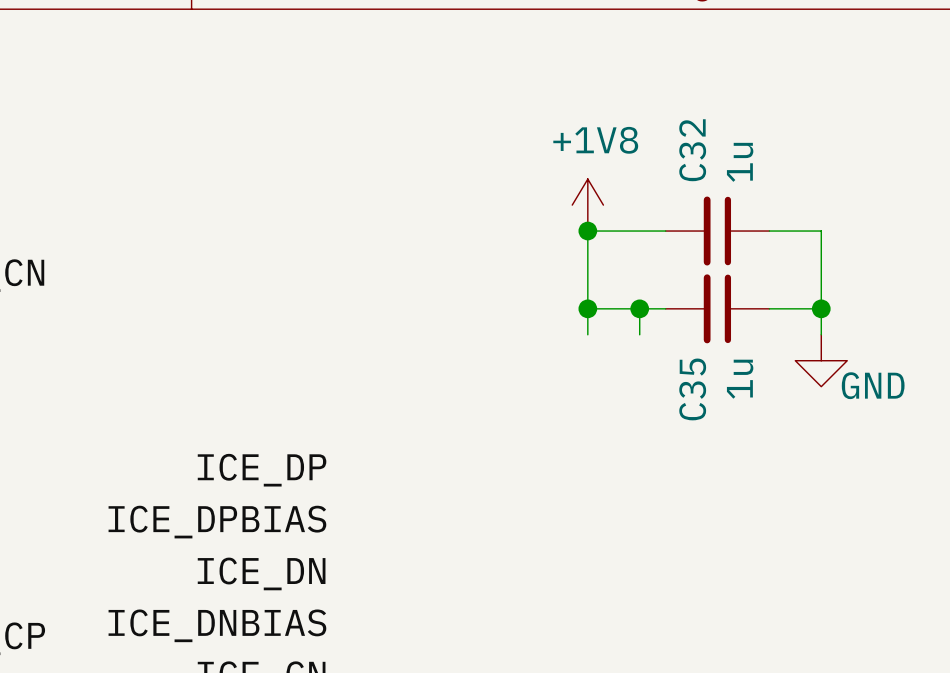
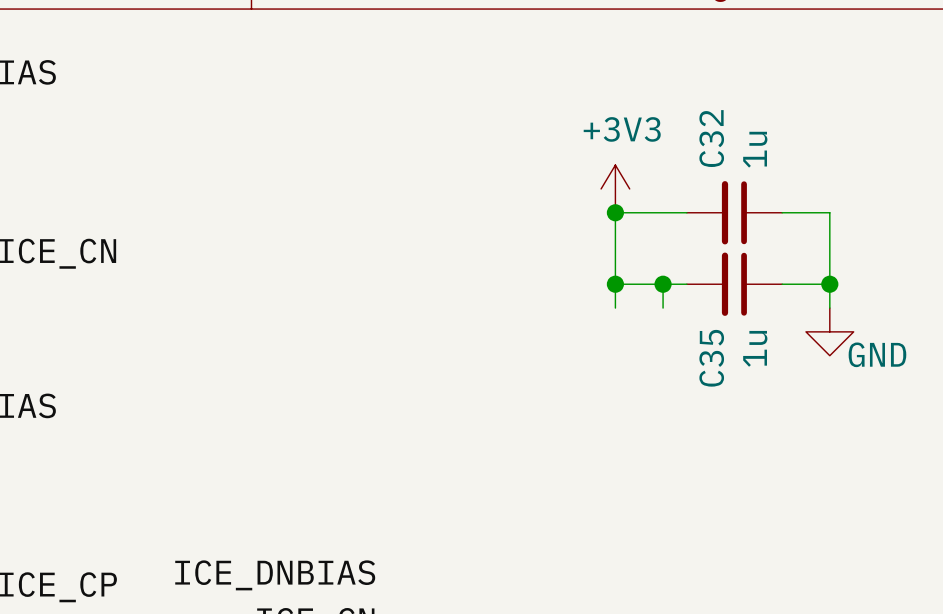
power symbol: +1V8 (587, 205) -> +3V3 (615, 188)
label: ICE_DP (262, 470) -> none
label: ICE_DPBIAS (217, 522) -> none
label: ICE_DN (261, 573) -> none

